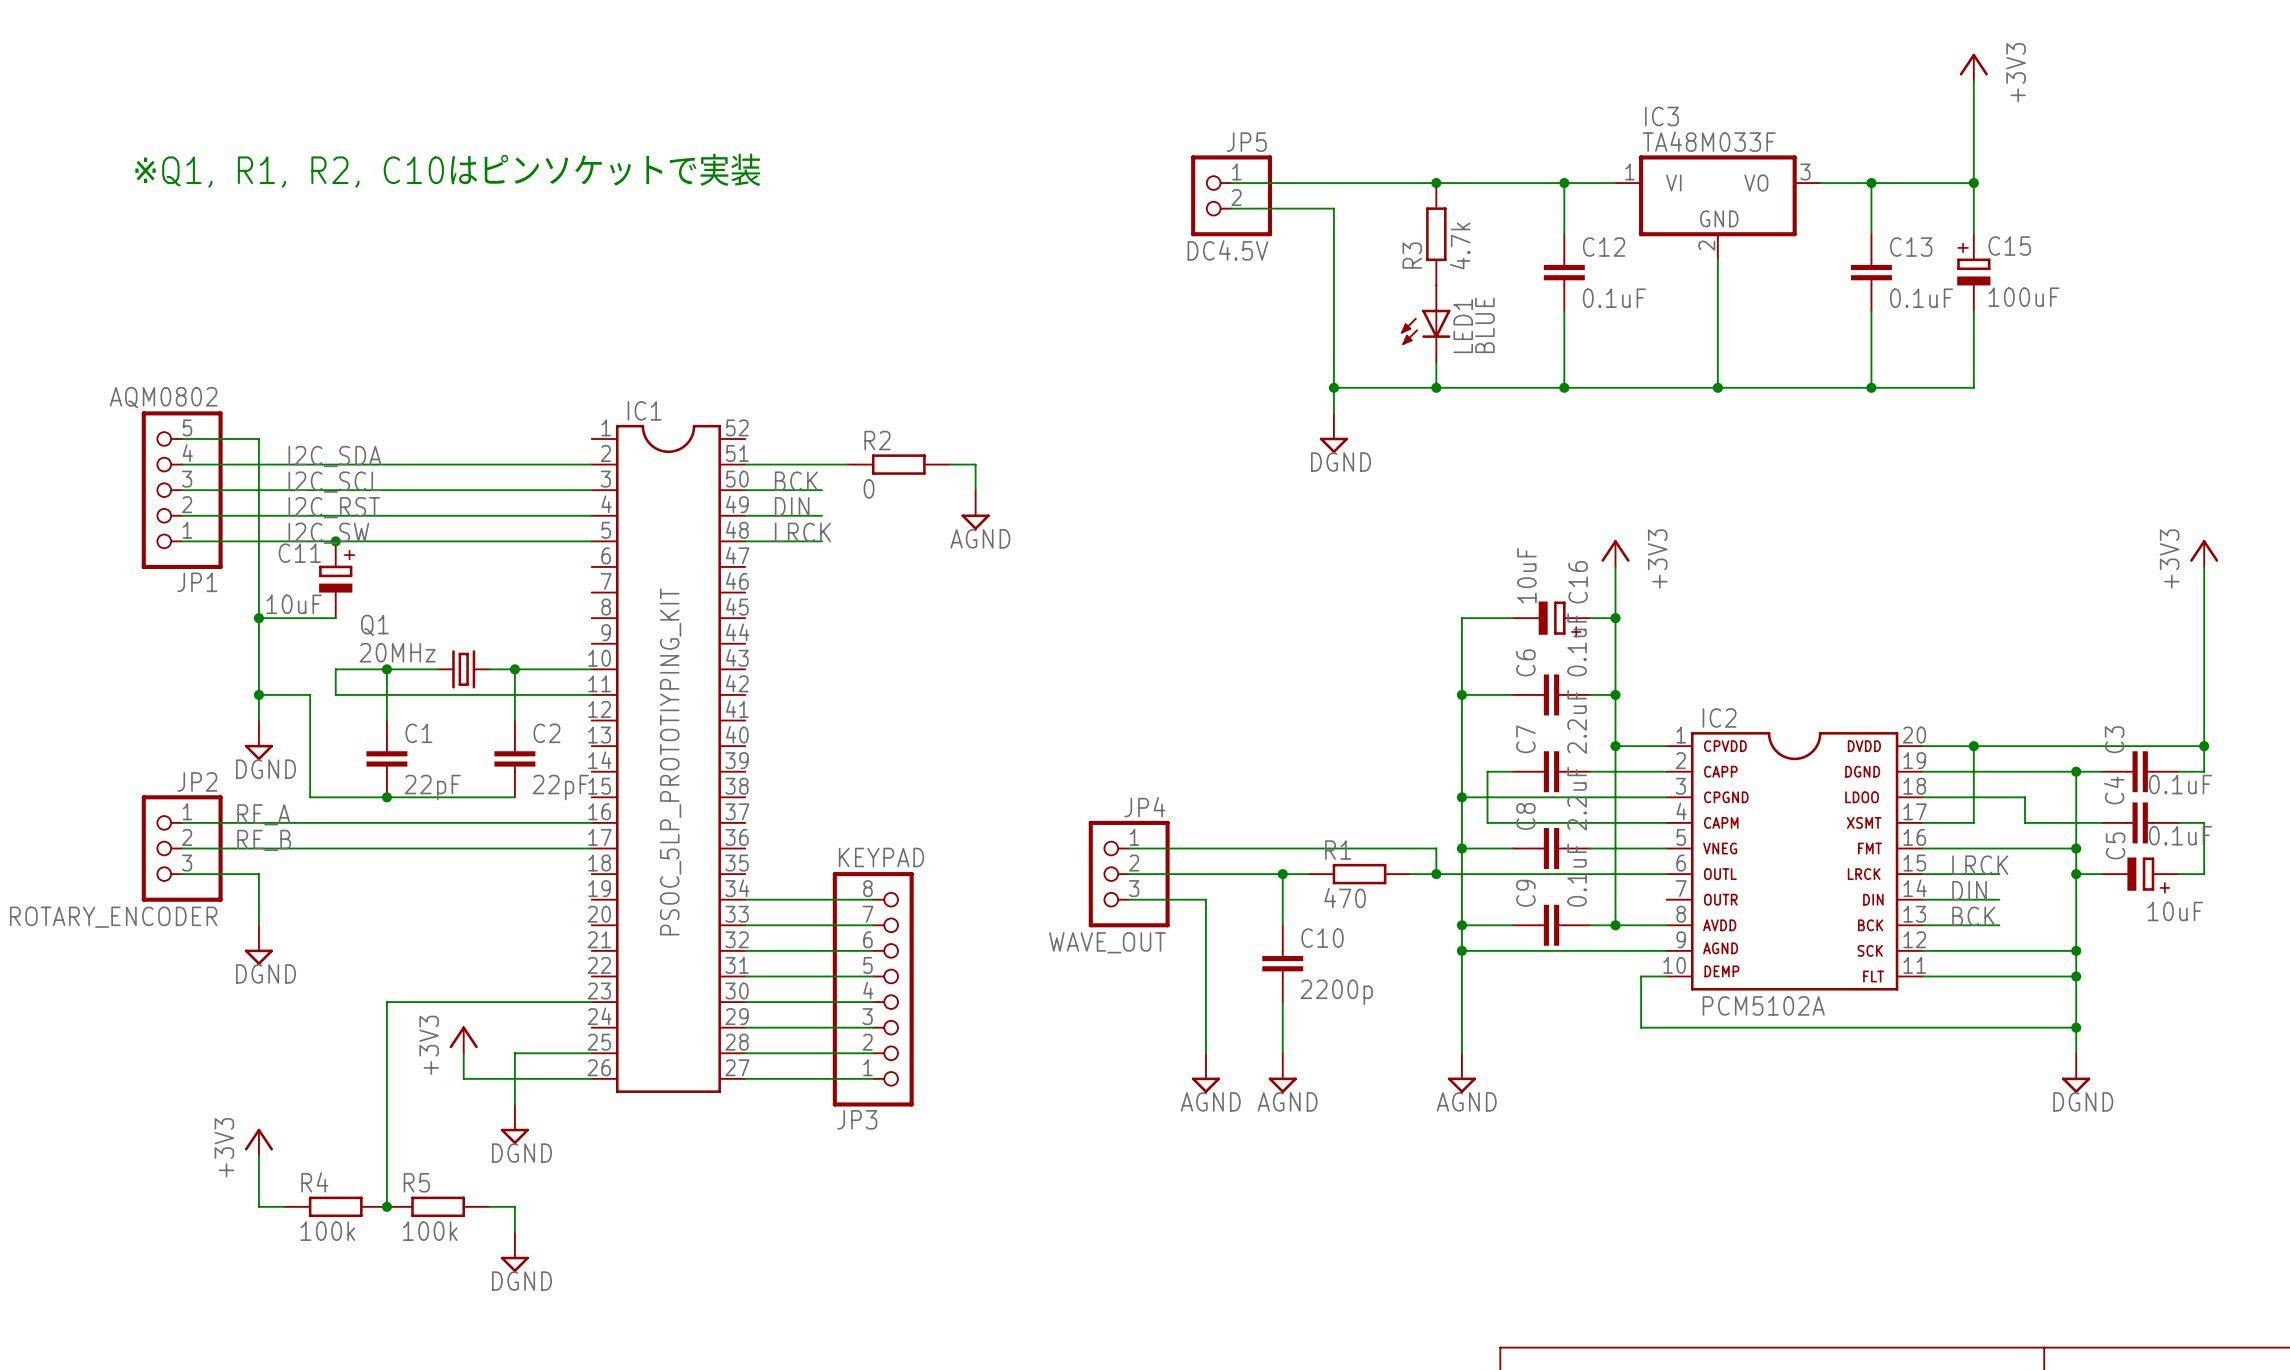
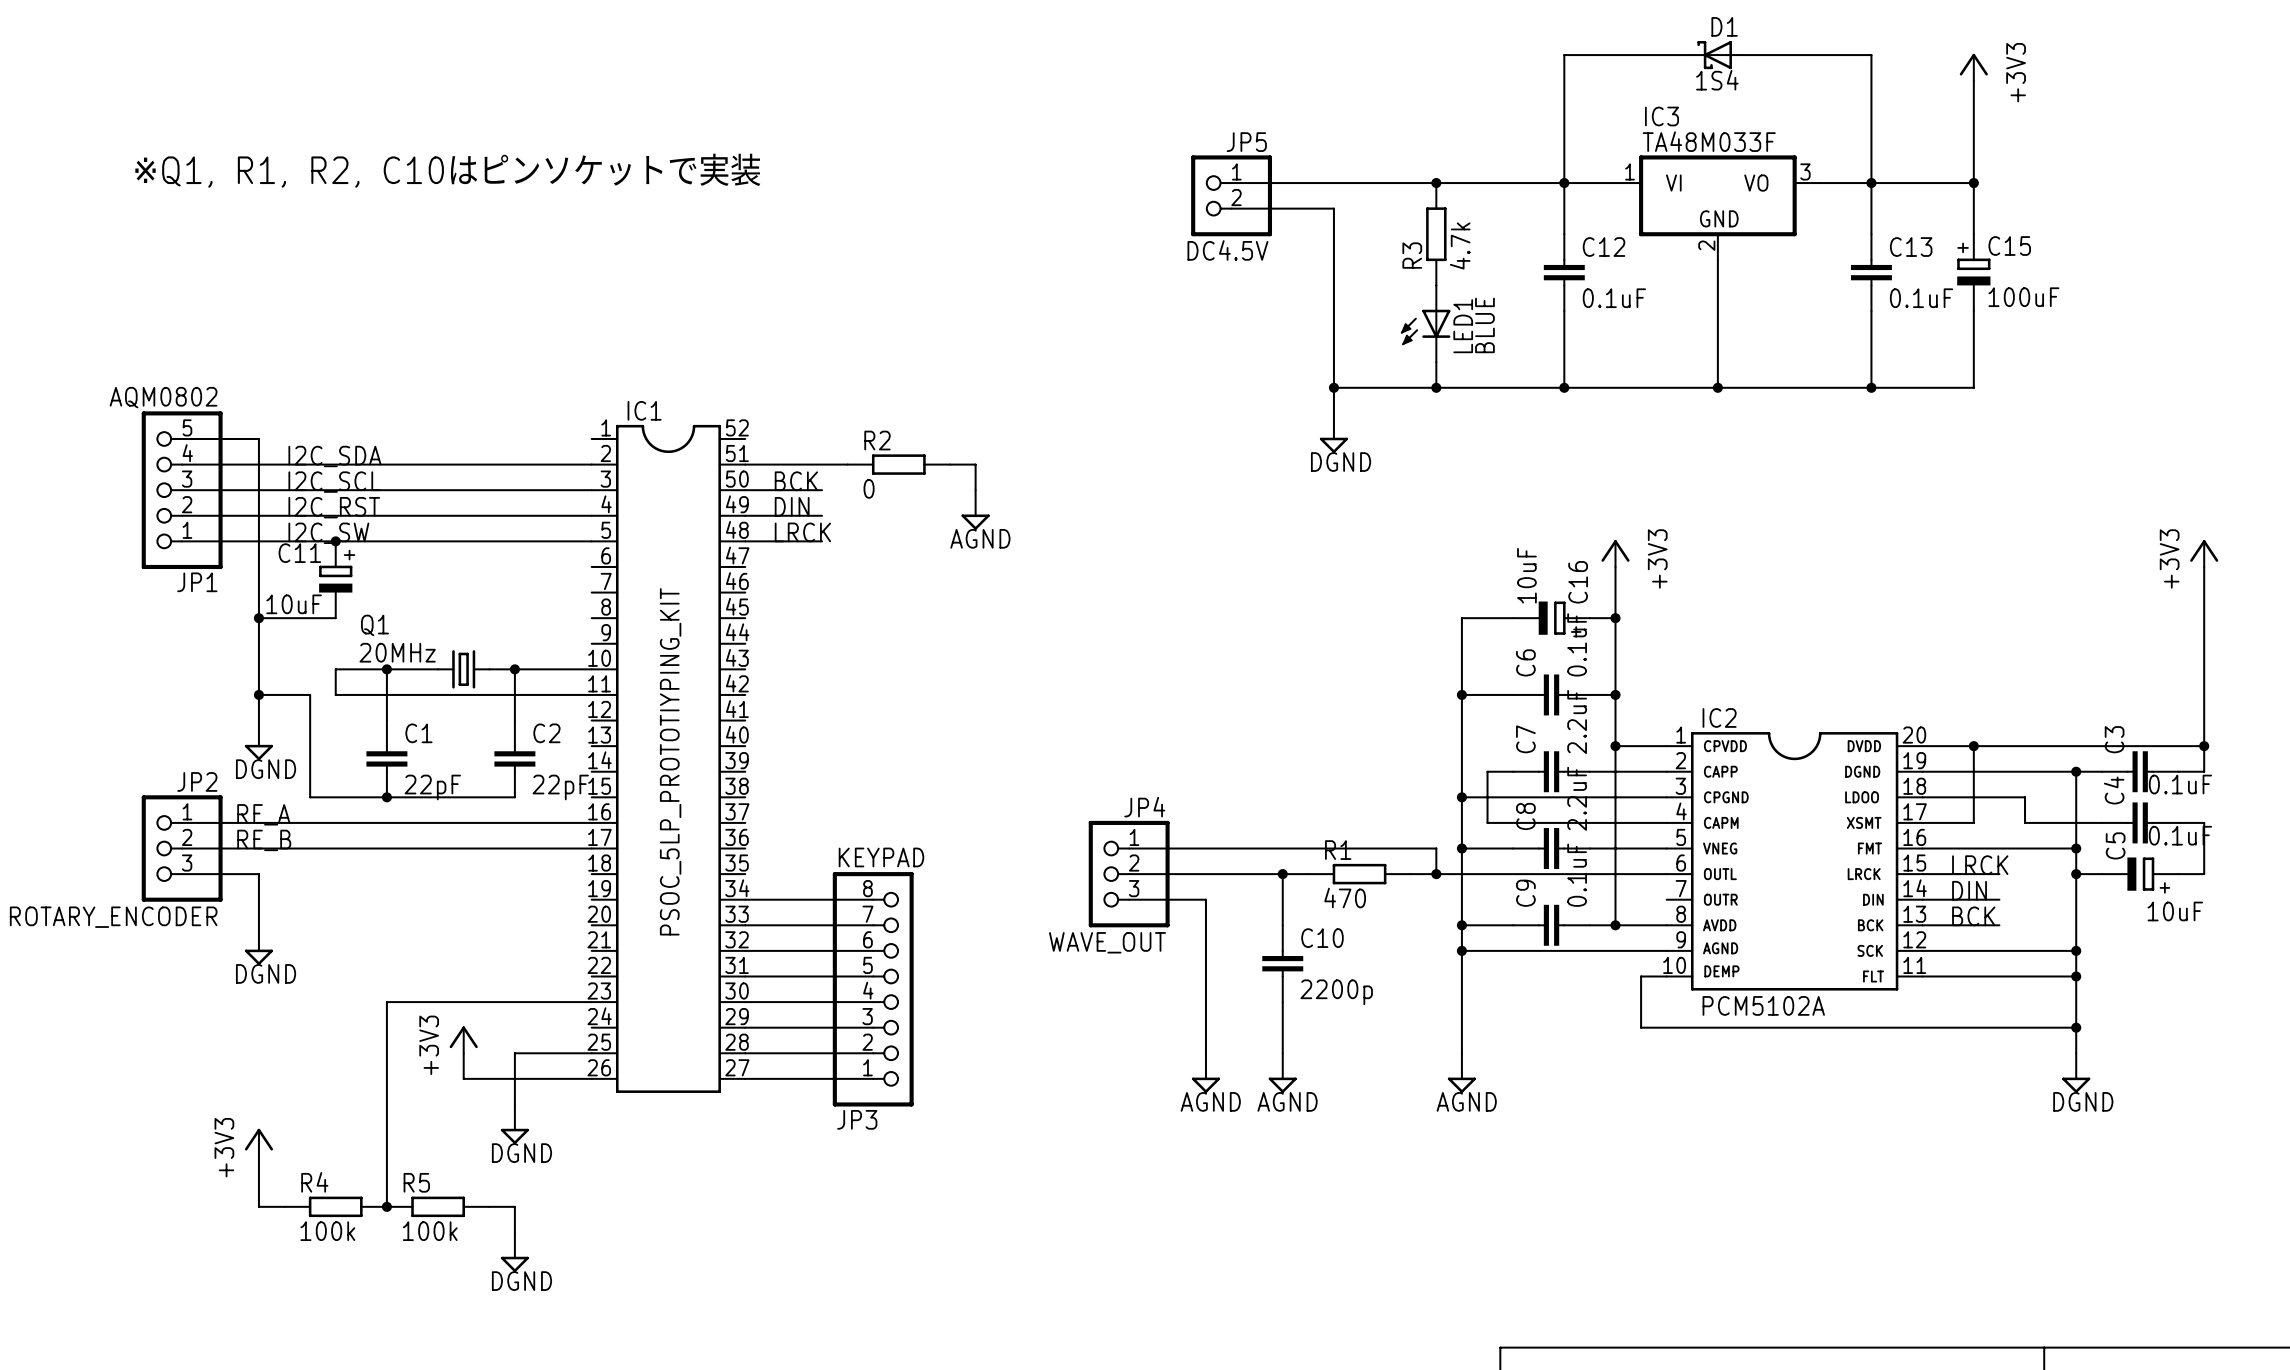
wire: none -> (1692, 55) (1564, 55) (1564, 183)
D1: none -> 1S4 (1717, 55)
wire: none -> (1743, 55) (1871, 55) (1871, 183)

